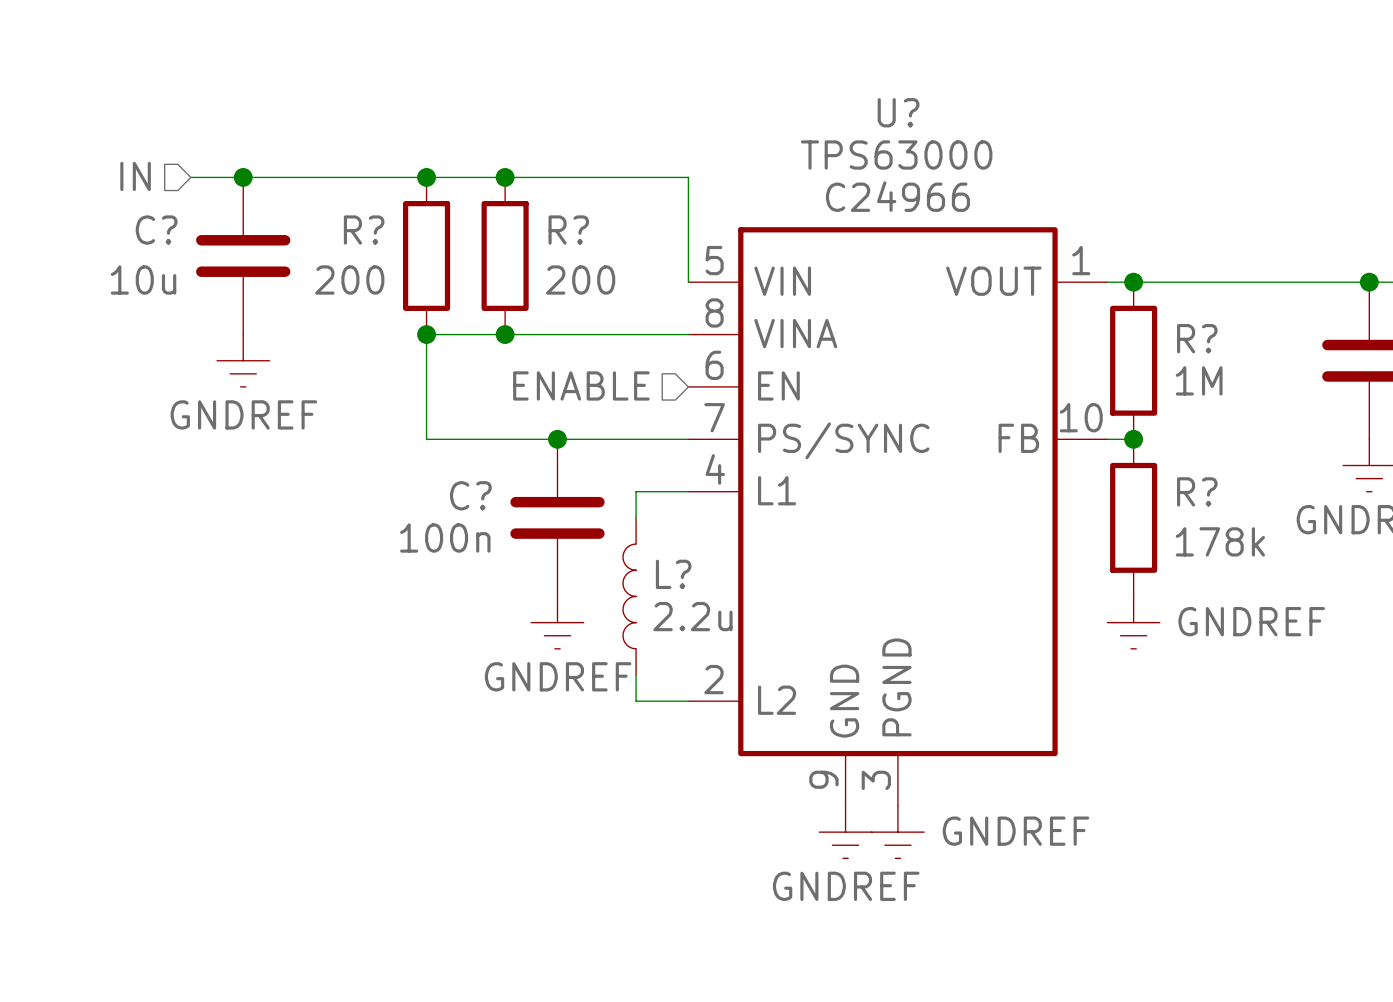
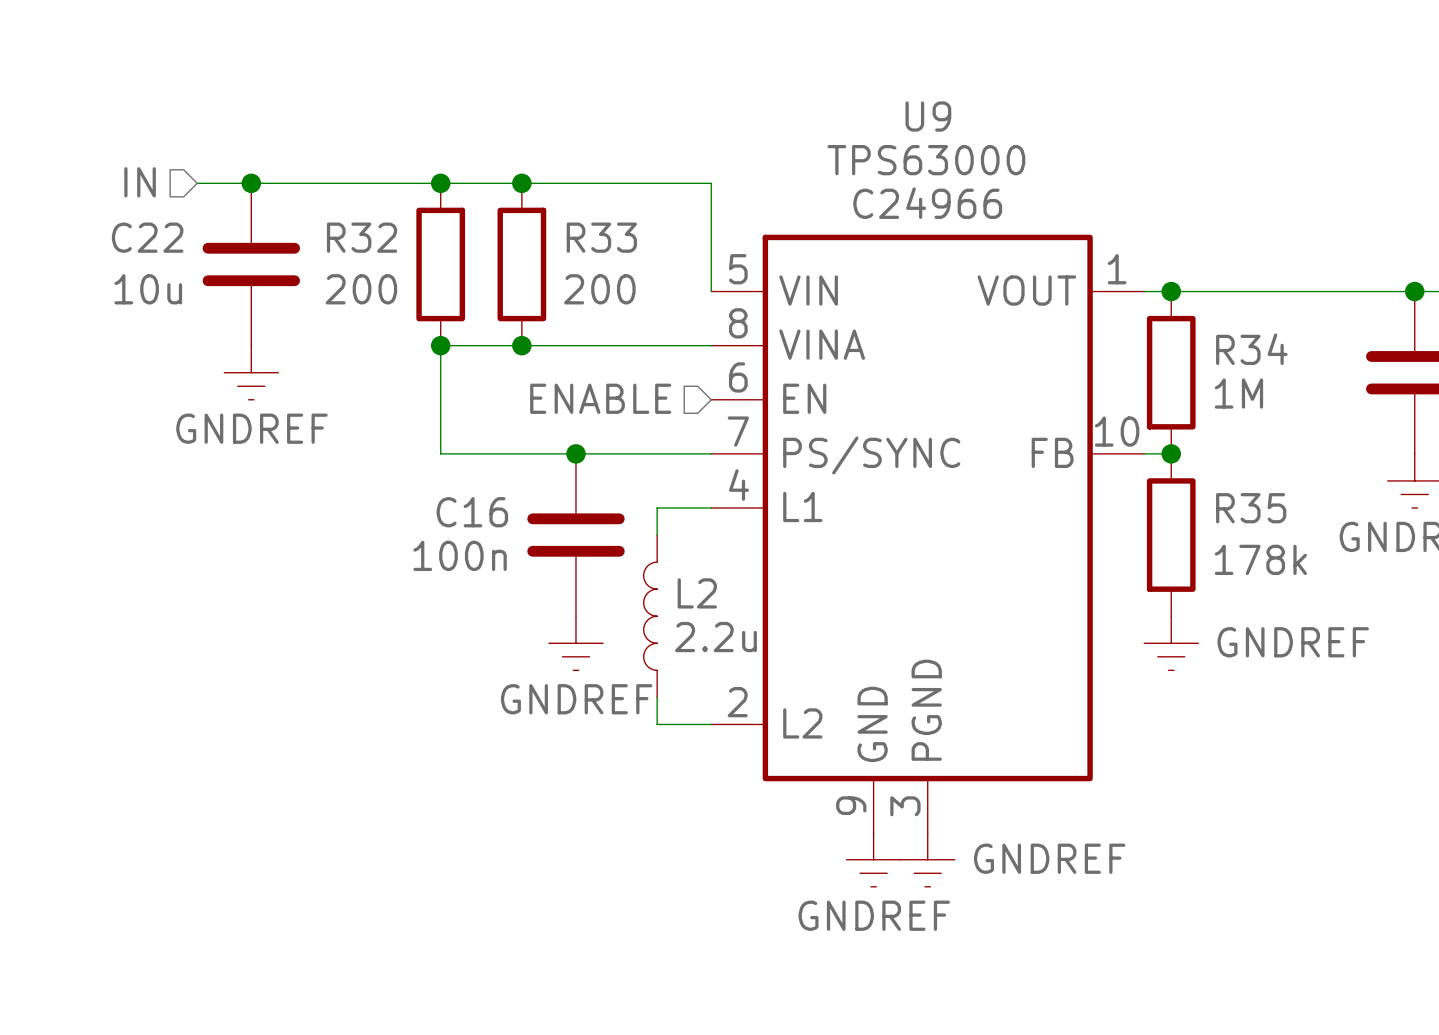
U? name: U? (898, 112) -> U9 (928, 116)
C? name: C? (156, 230) -> C22 (147, 237)
R? name: R? (364, 230) -> R32 (362, 237)
R? name: R? (568, 230) -> R33 (601, 237)
R? name: R? (1197, 338) -> R34 (1251, 349)
R? name: R? (1197, 491) -> R35 (1251, 508)
C? name: C? (470, 495) -> C16 (472, 512)
L? name: L? (673, 574) -> L2 (697, 593)

